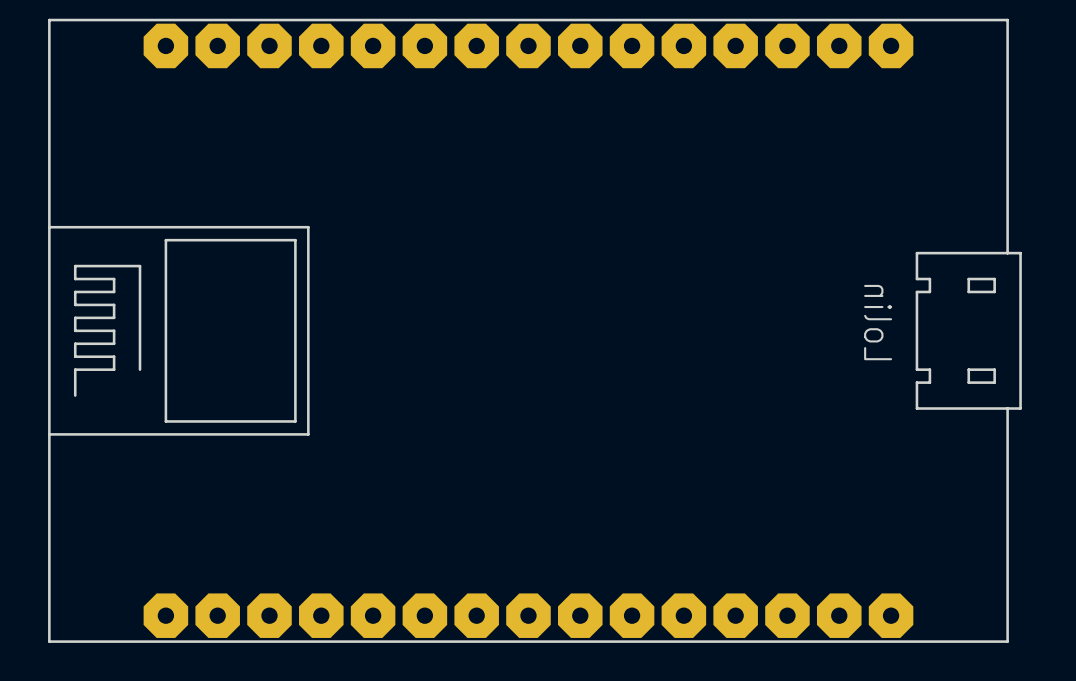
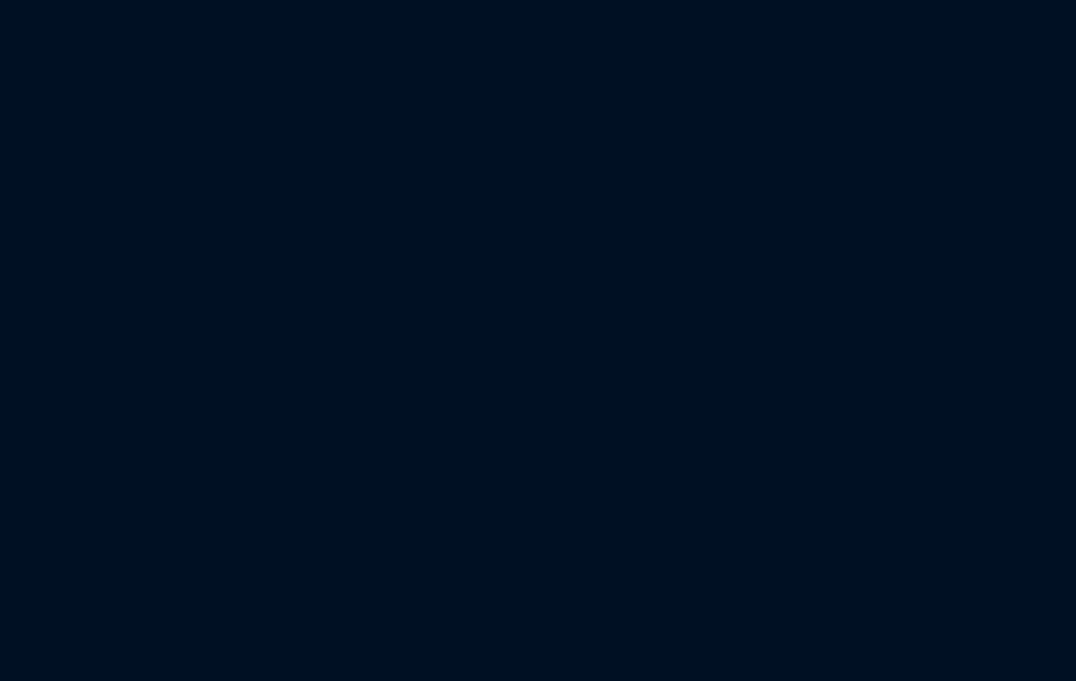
part: (534, 330) -> none

